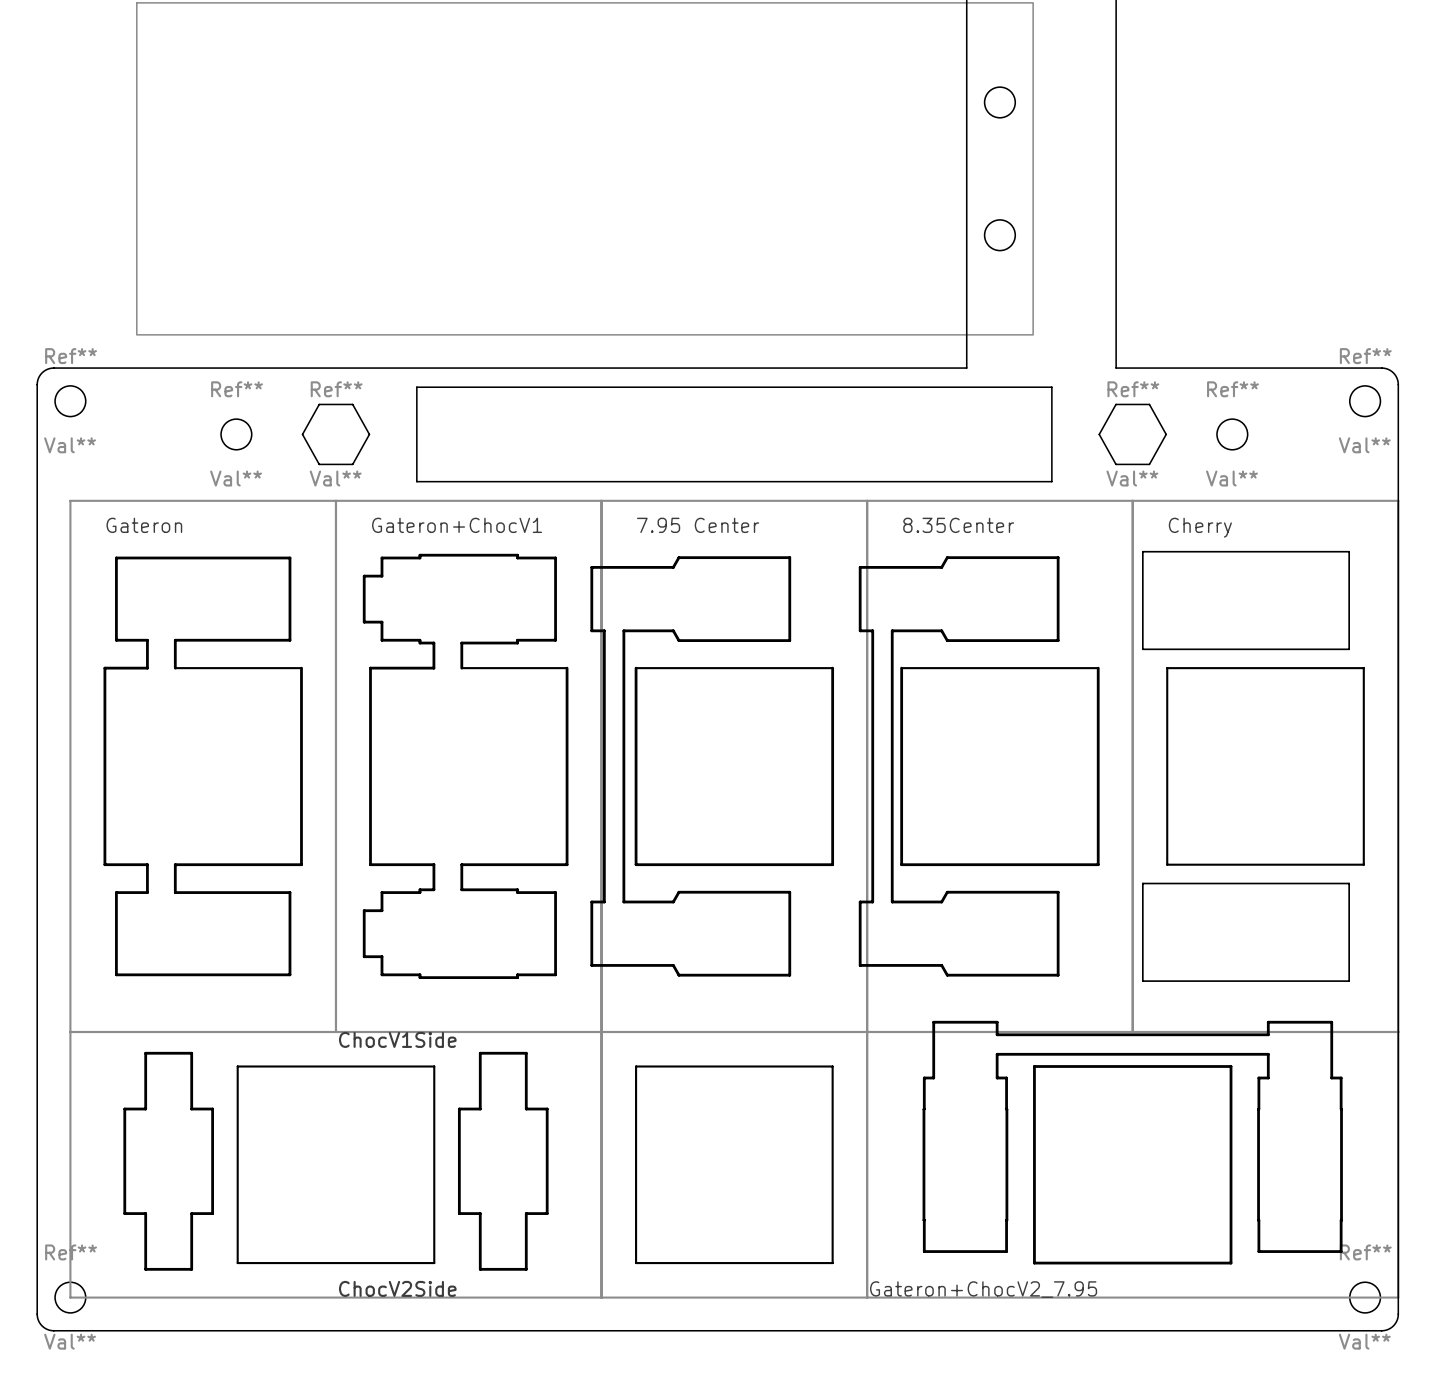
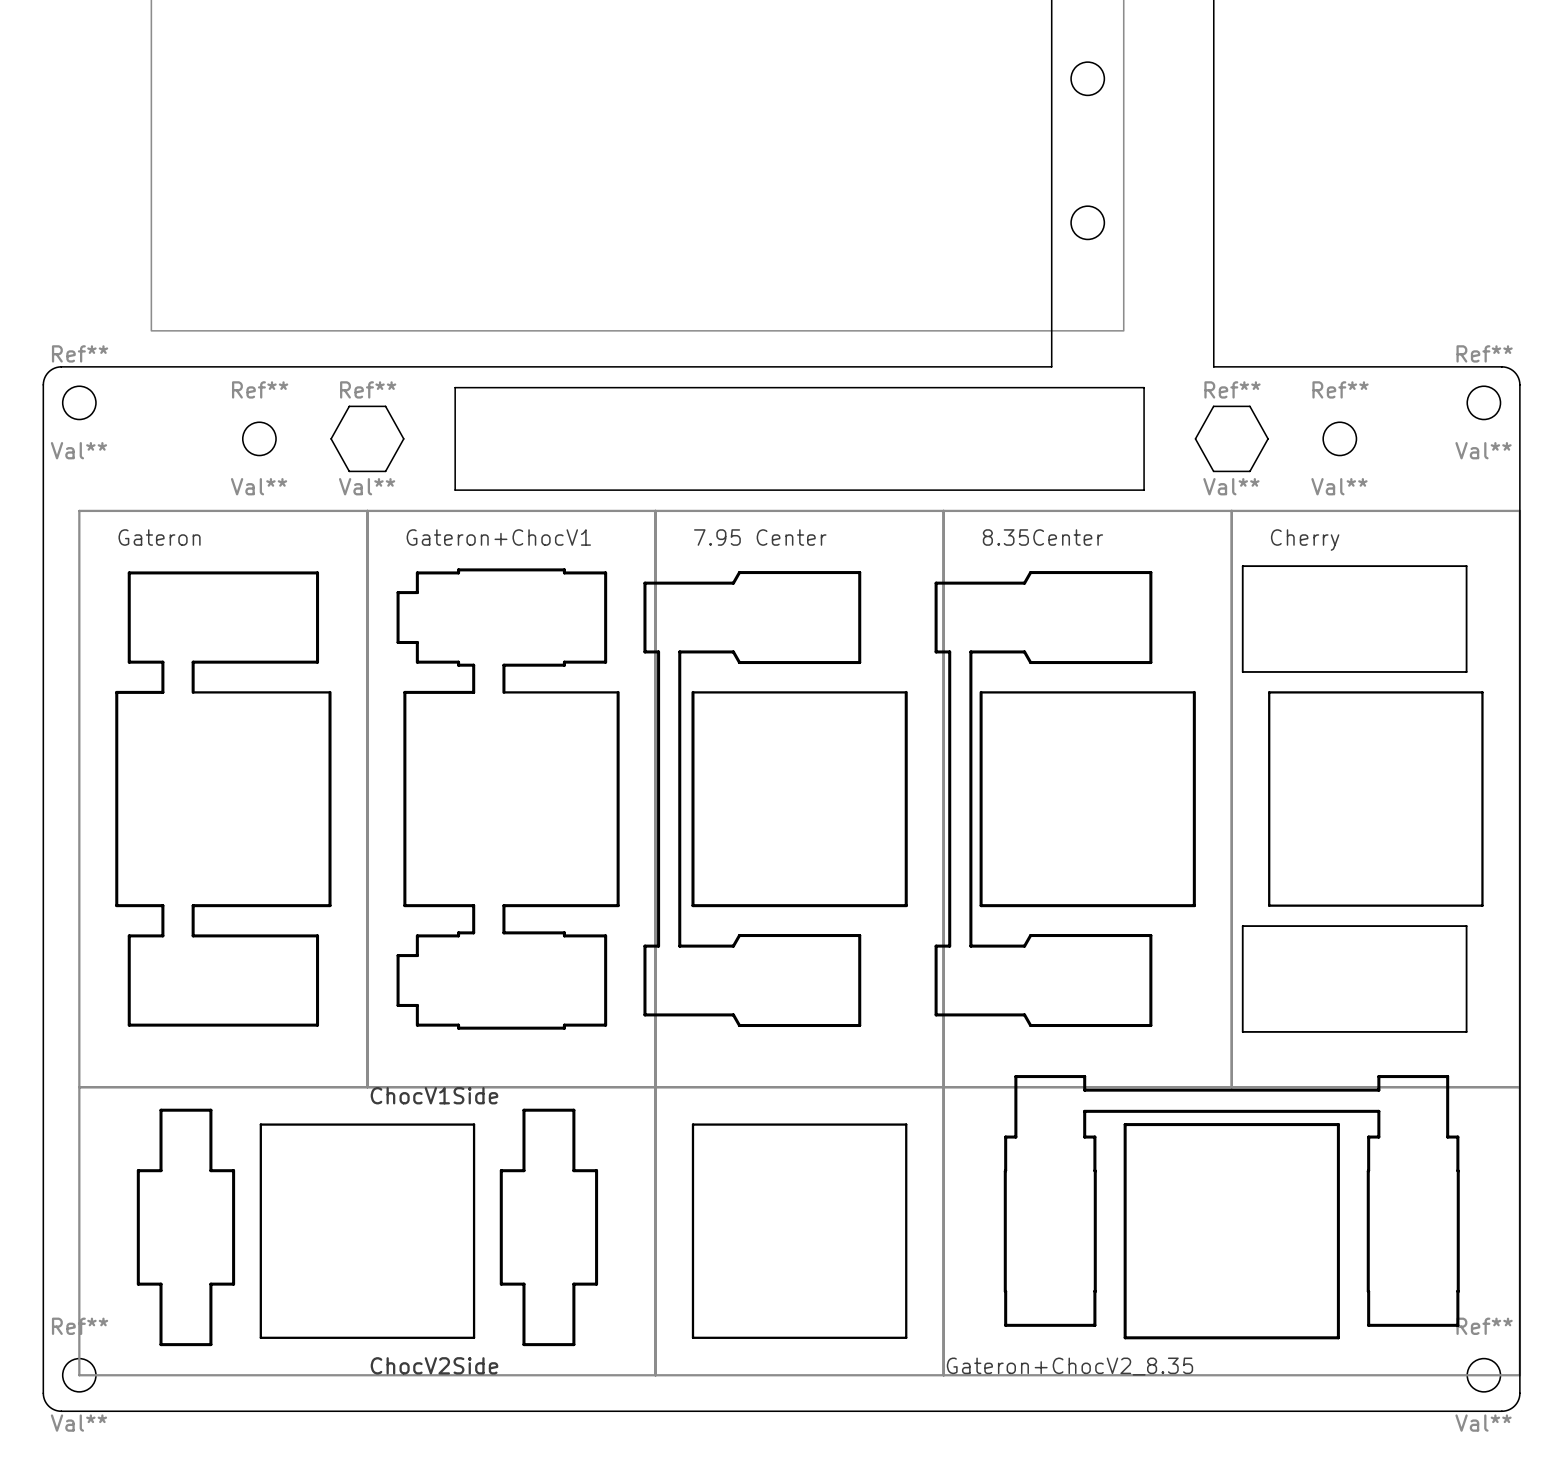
text: Gateron+ChocV2_7.95 (983, 1289) -> Gateron+ChocV2_8.35 (1069, 1366)

